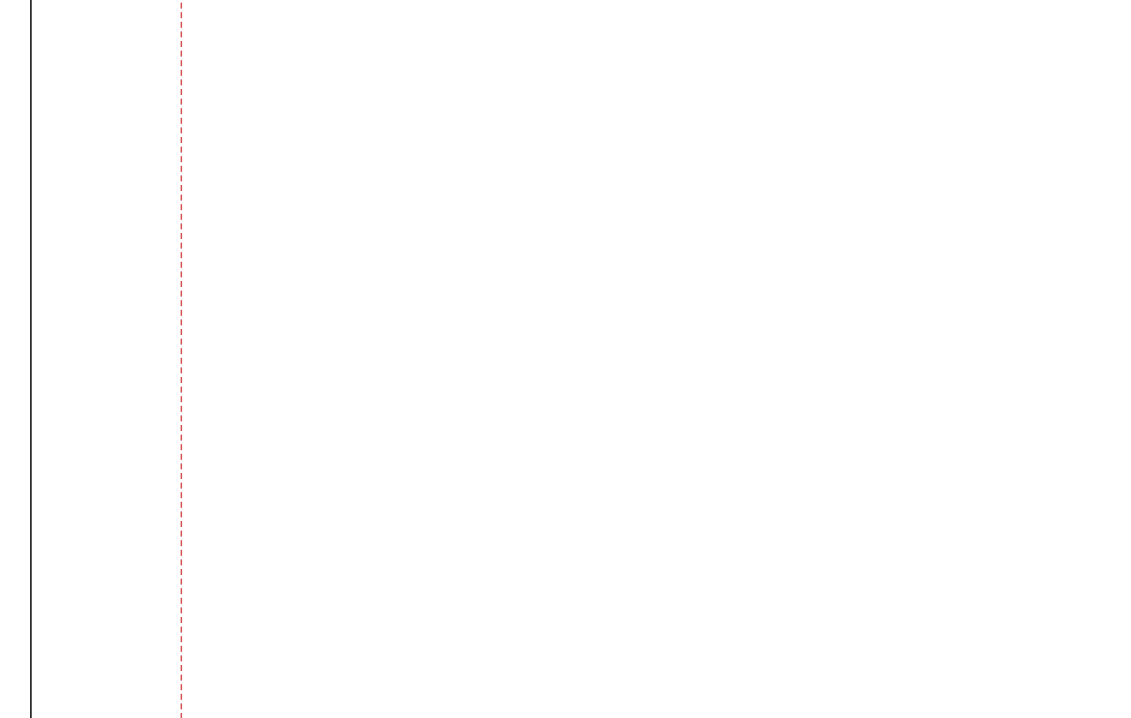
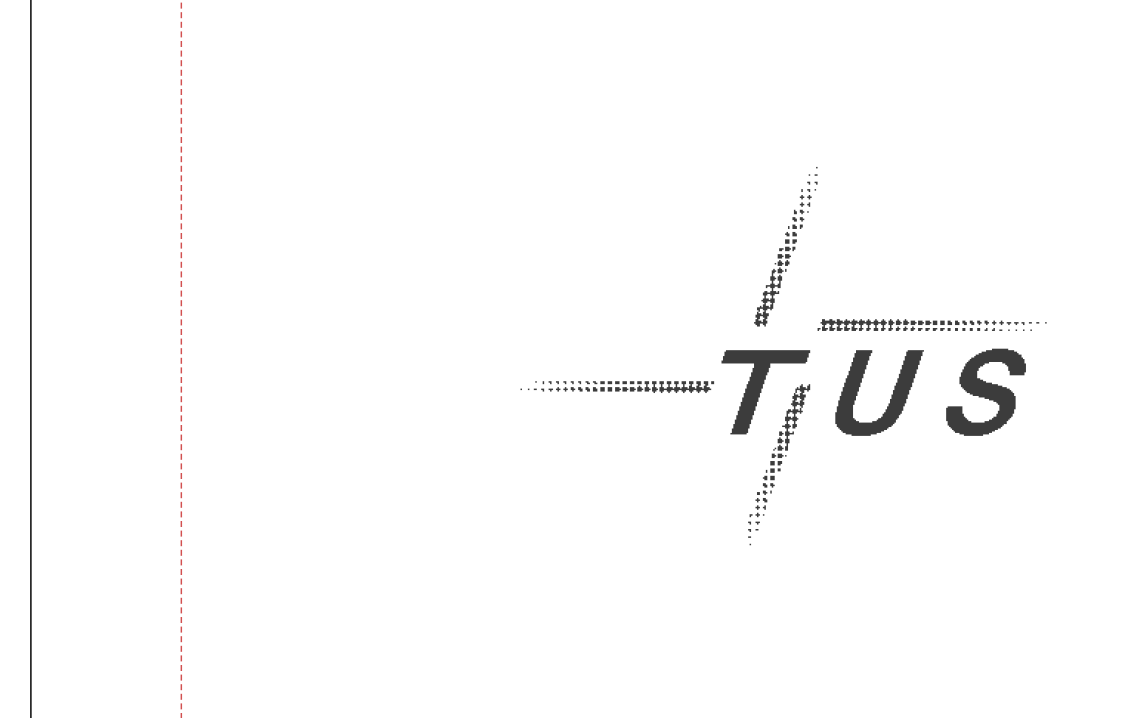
drawing: none -> [520, 166, 1047, 546]

